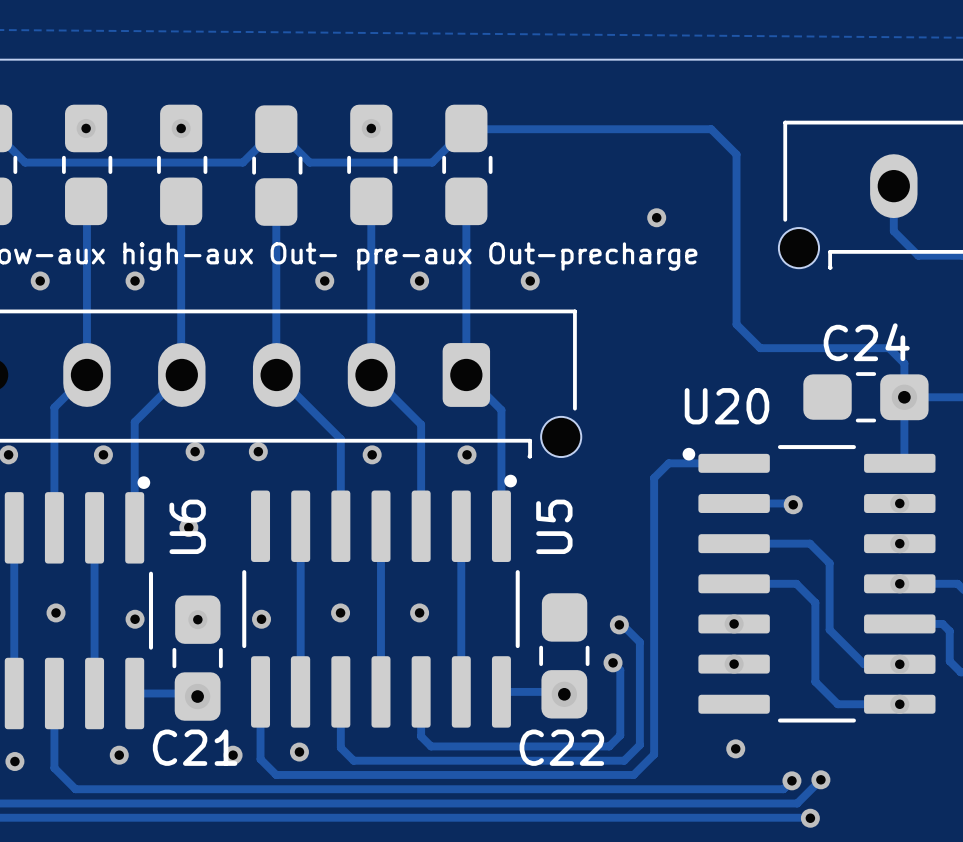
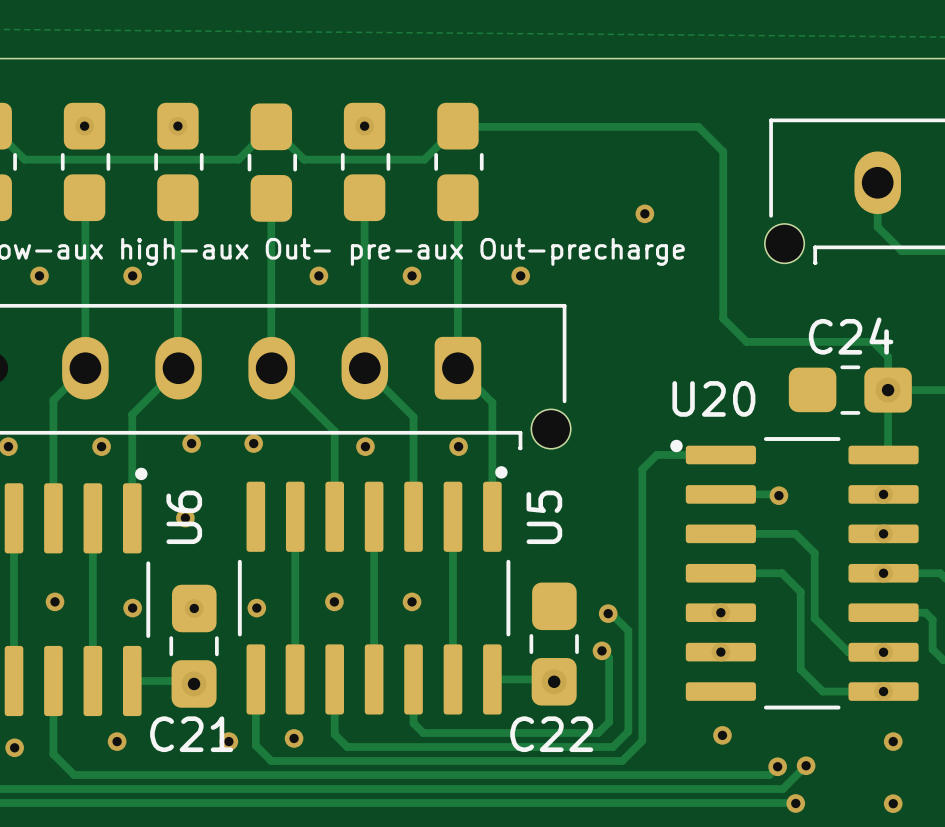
via: none -> (893, 741)
via: none -> (893, 803)

